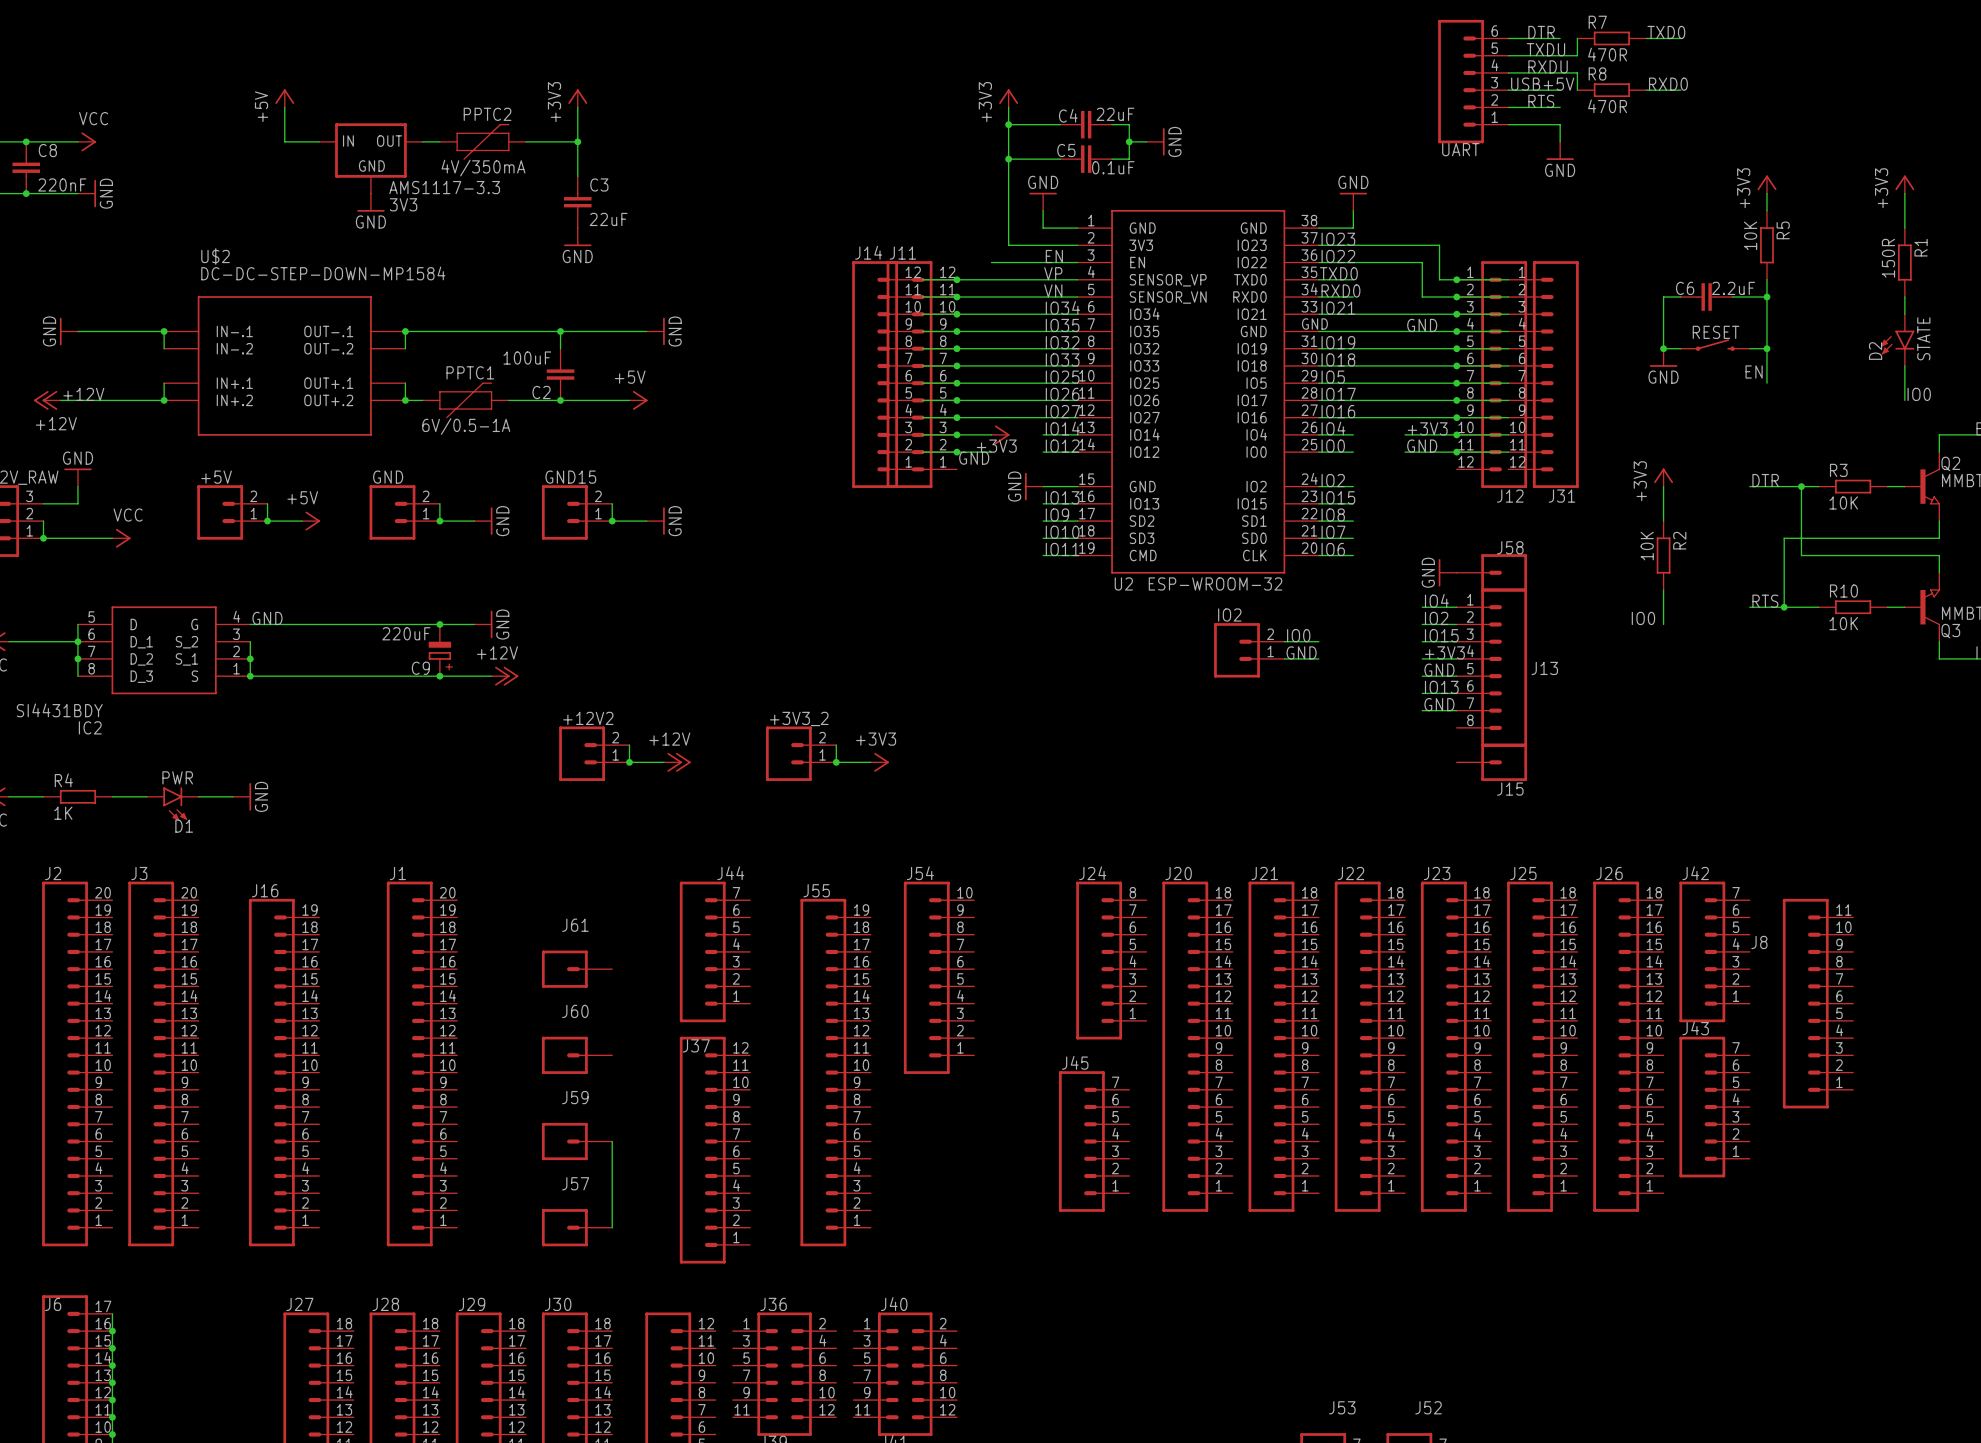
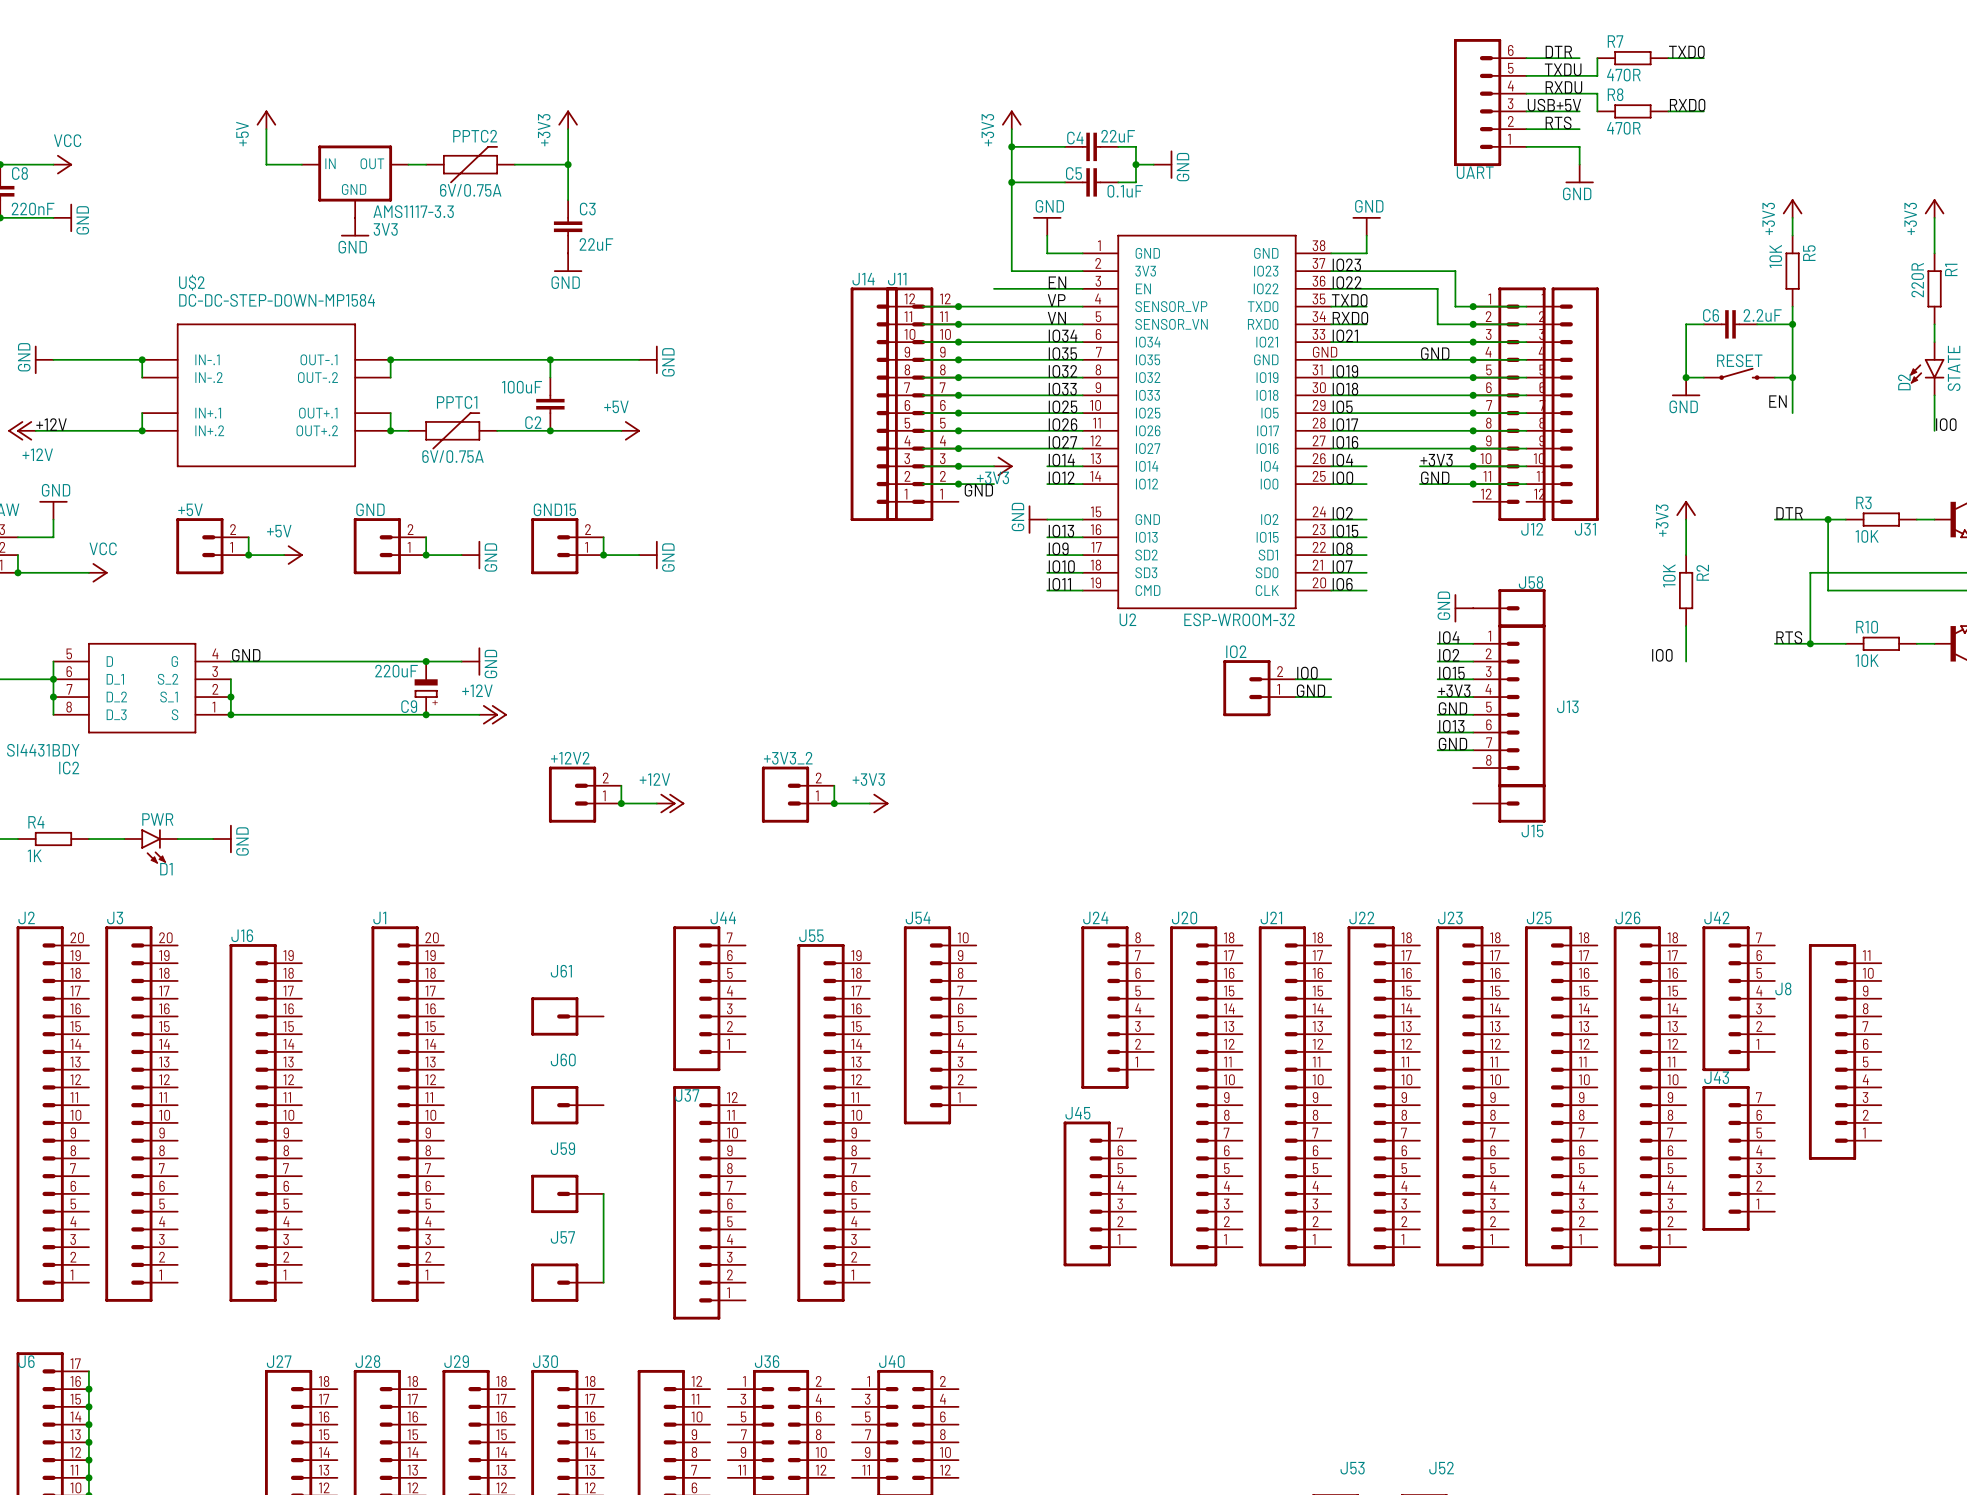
PPTC2 value: 4V/350mA (483, 168) -> 6V/0.75A (470, 190)
R1 value: 150R (1888, 258) -> 220R (1917, 280)
PPTC1 value: 6V/0.5-1A (466, 426) -> 6V/0.75A (453, 456)

